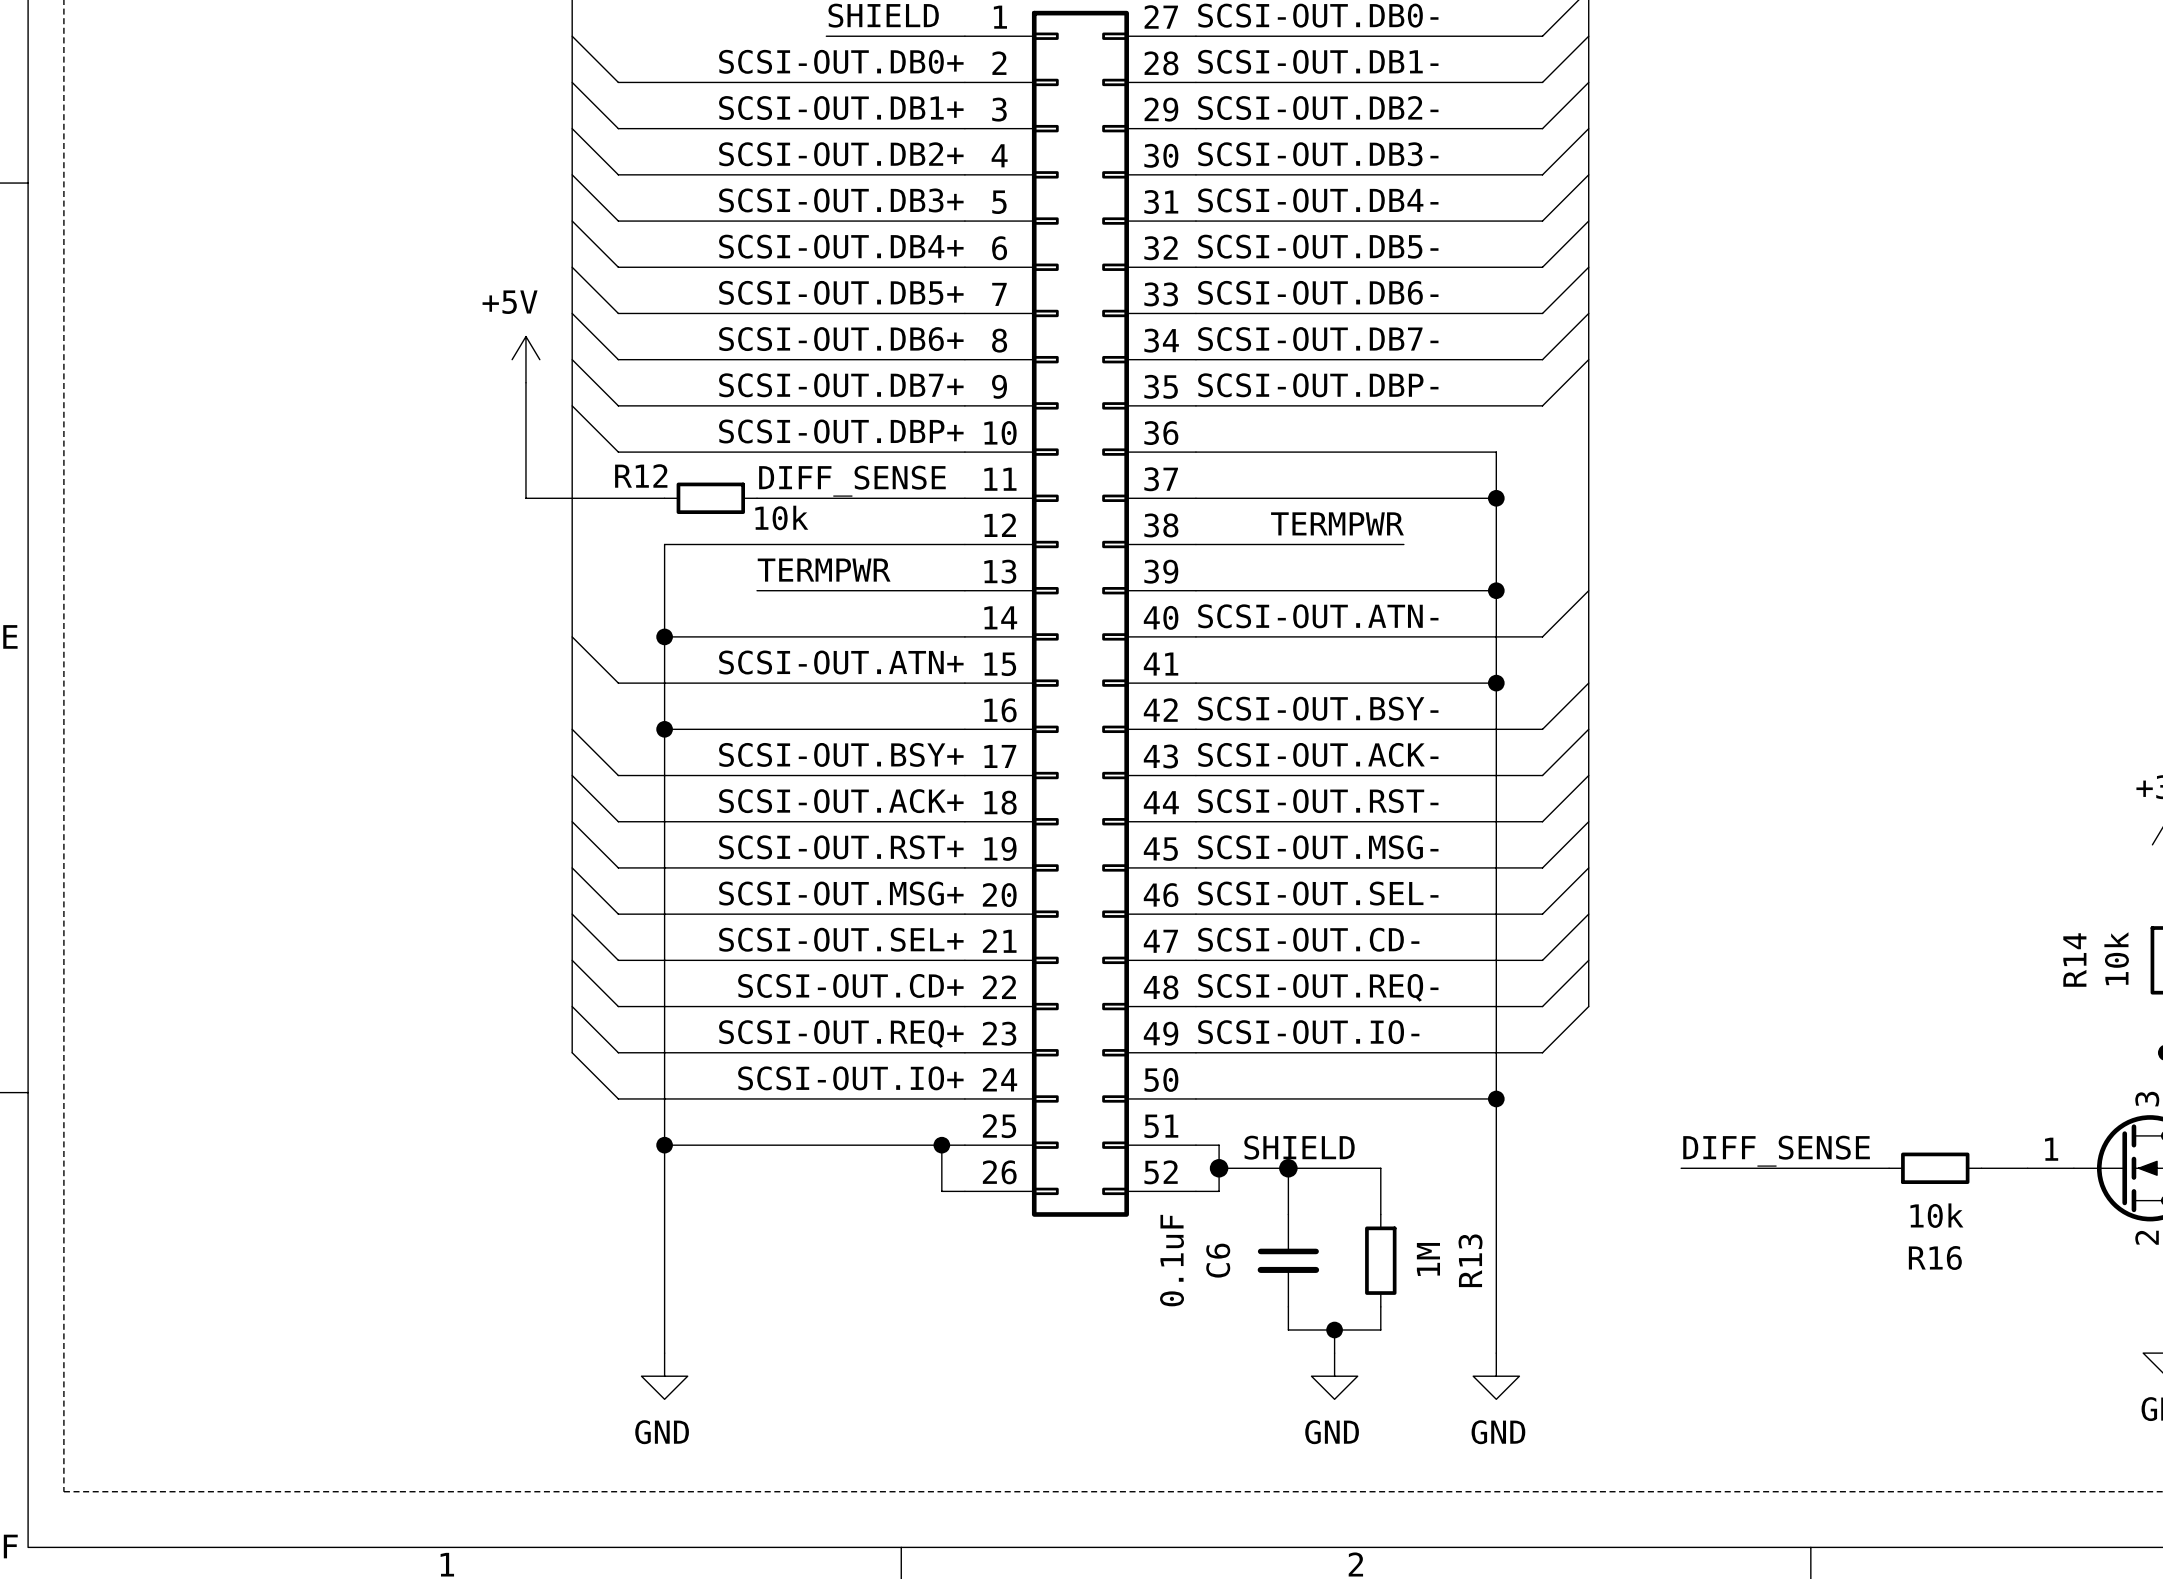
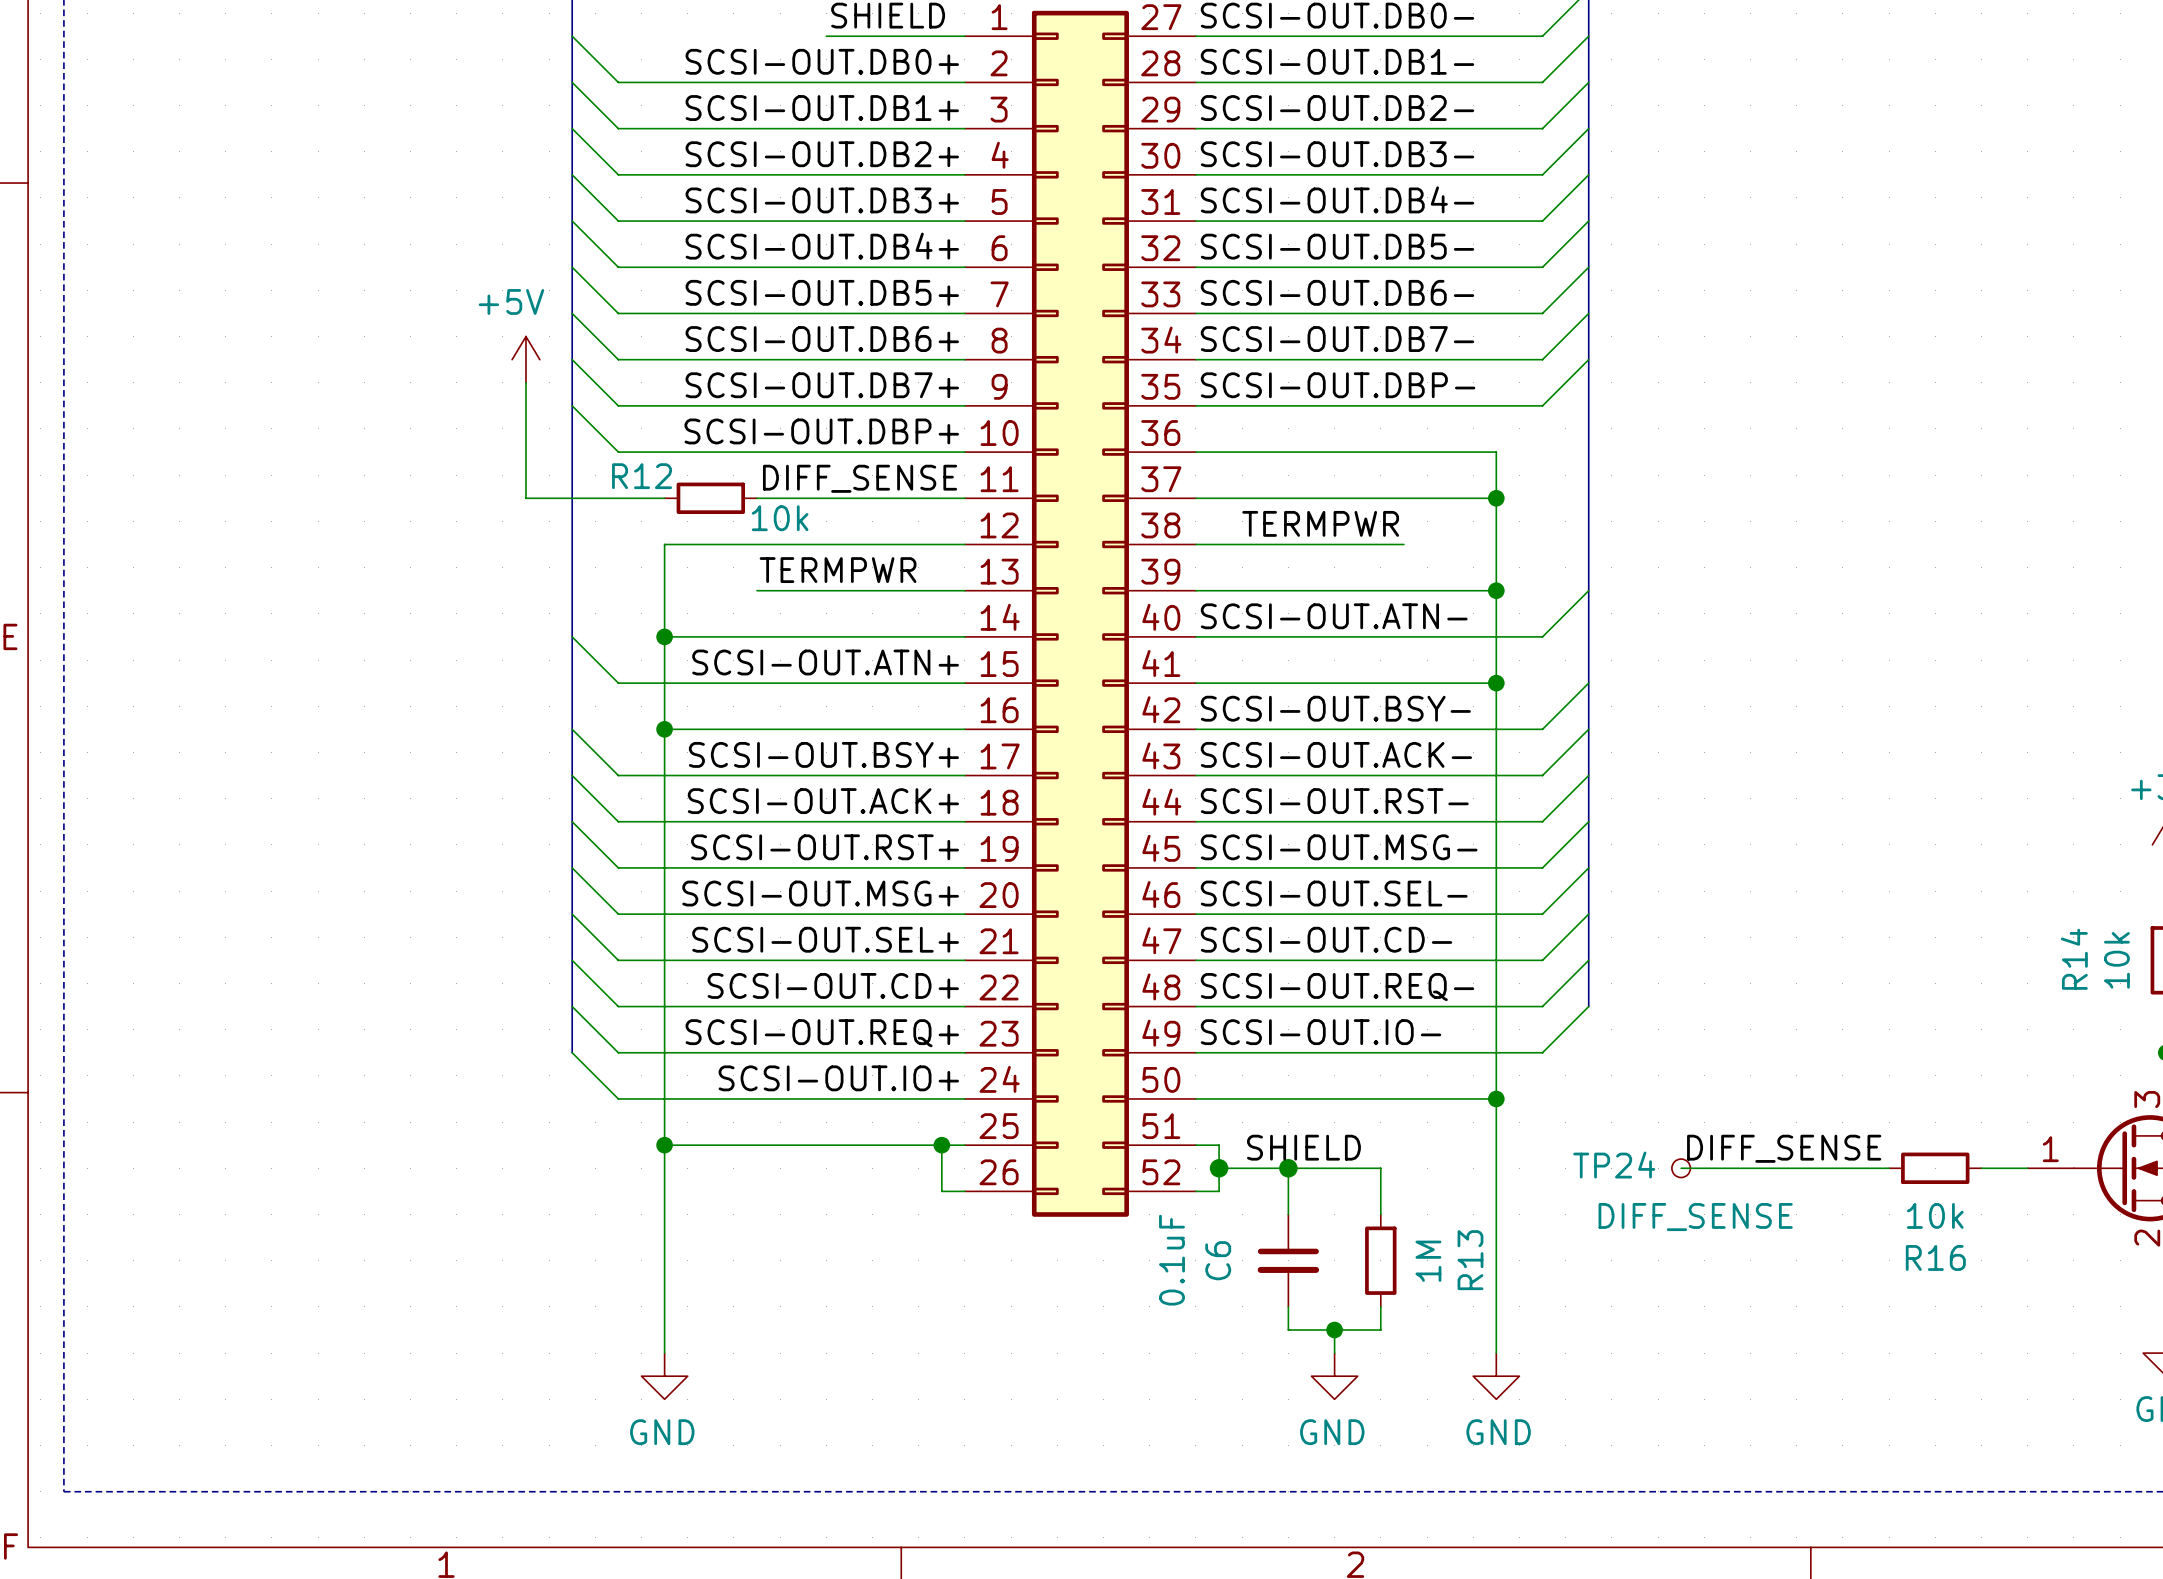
TP24: none -> DIFF_SENSE (1681, 1168)

